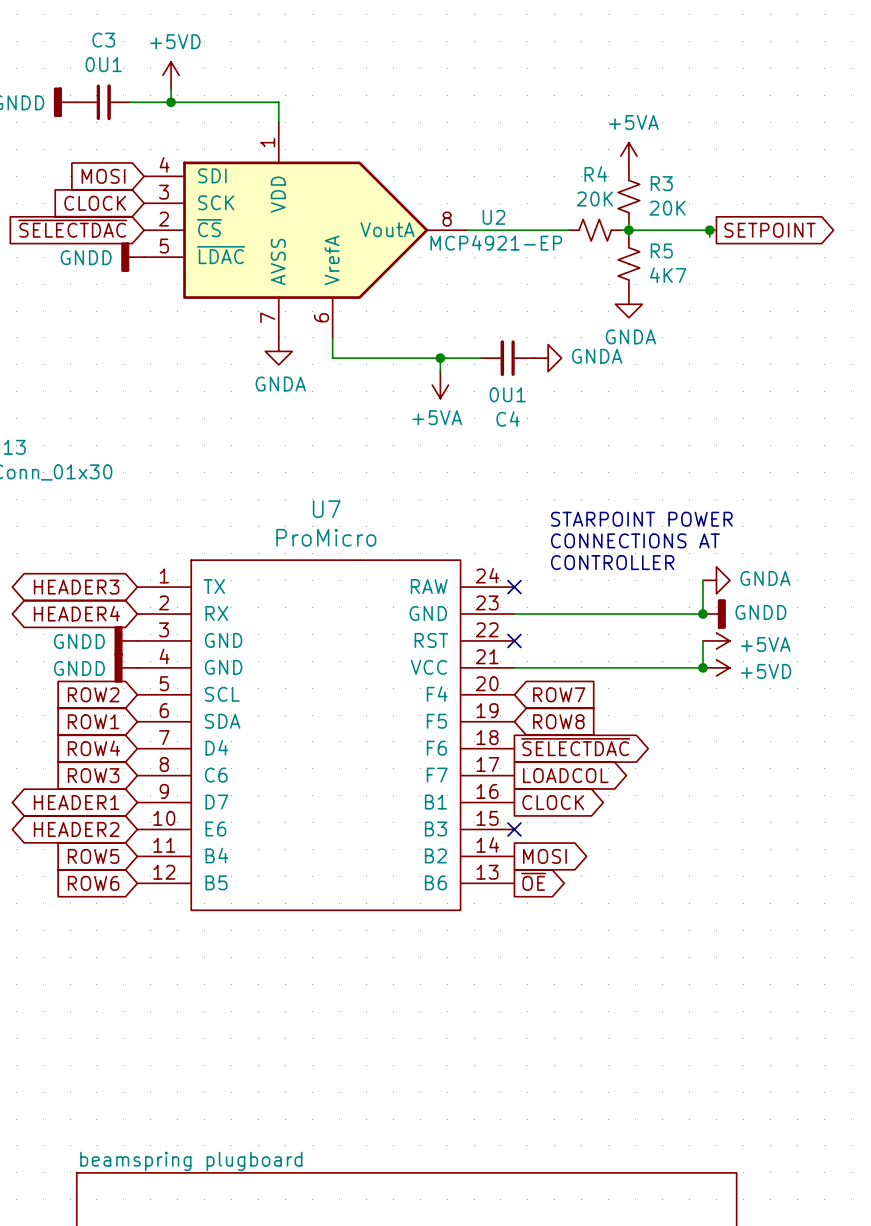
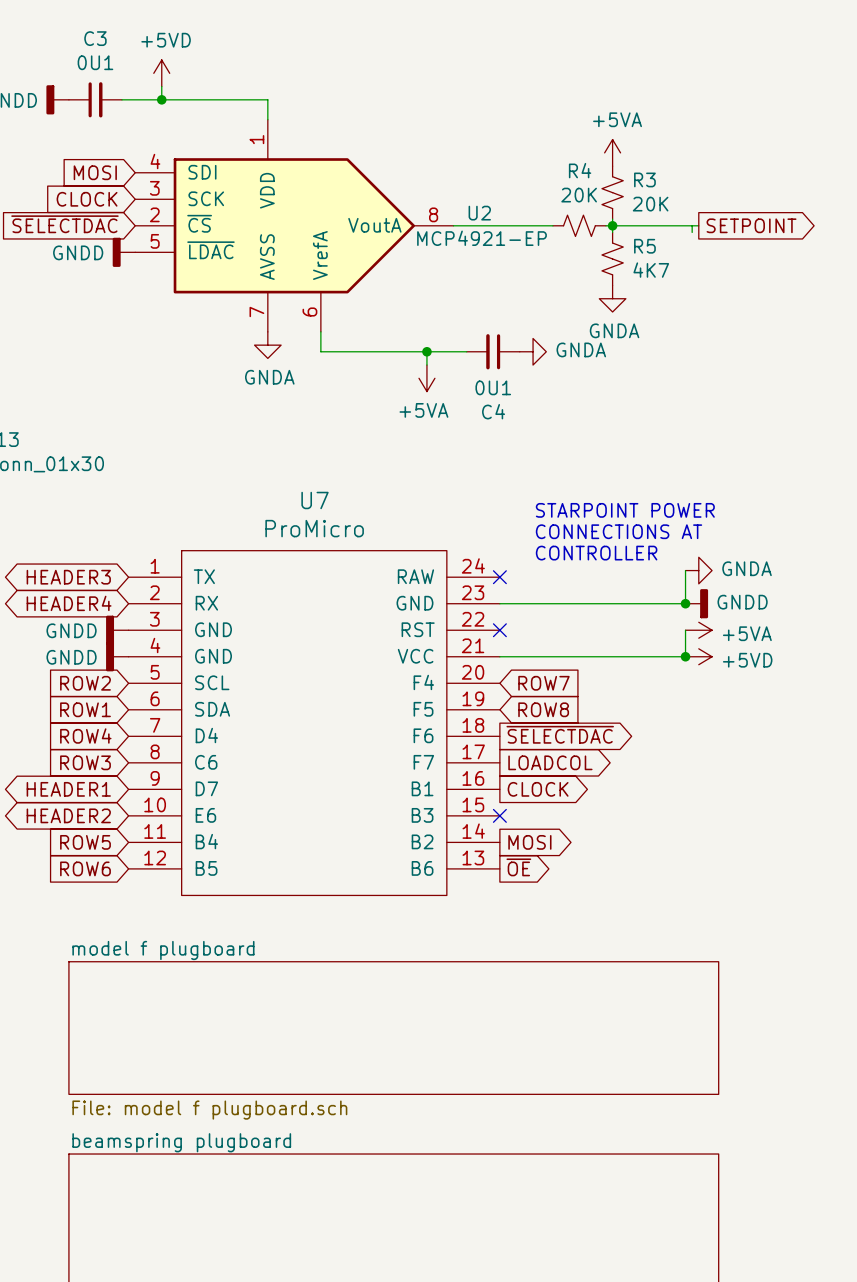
junction: (709, 230) -> none
sheet model f plugboard: none -> File: model f plugboard.sch (393, 1028)

